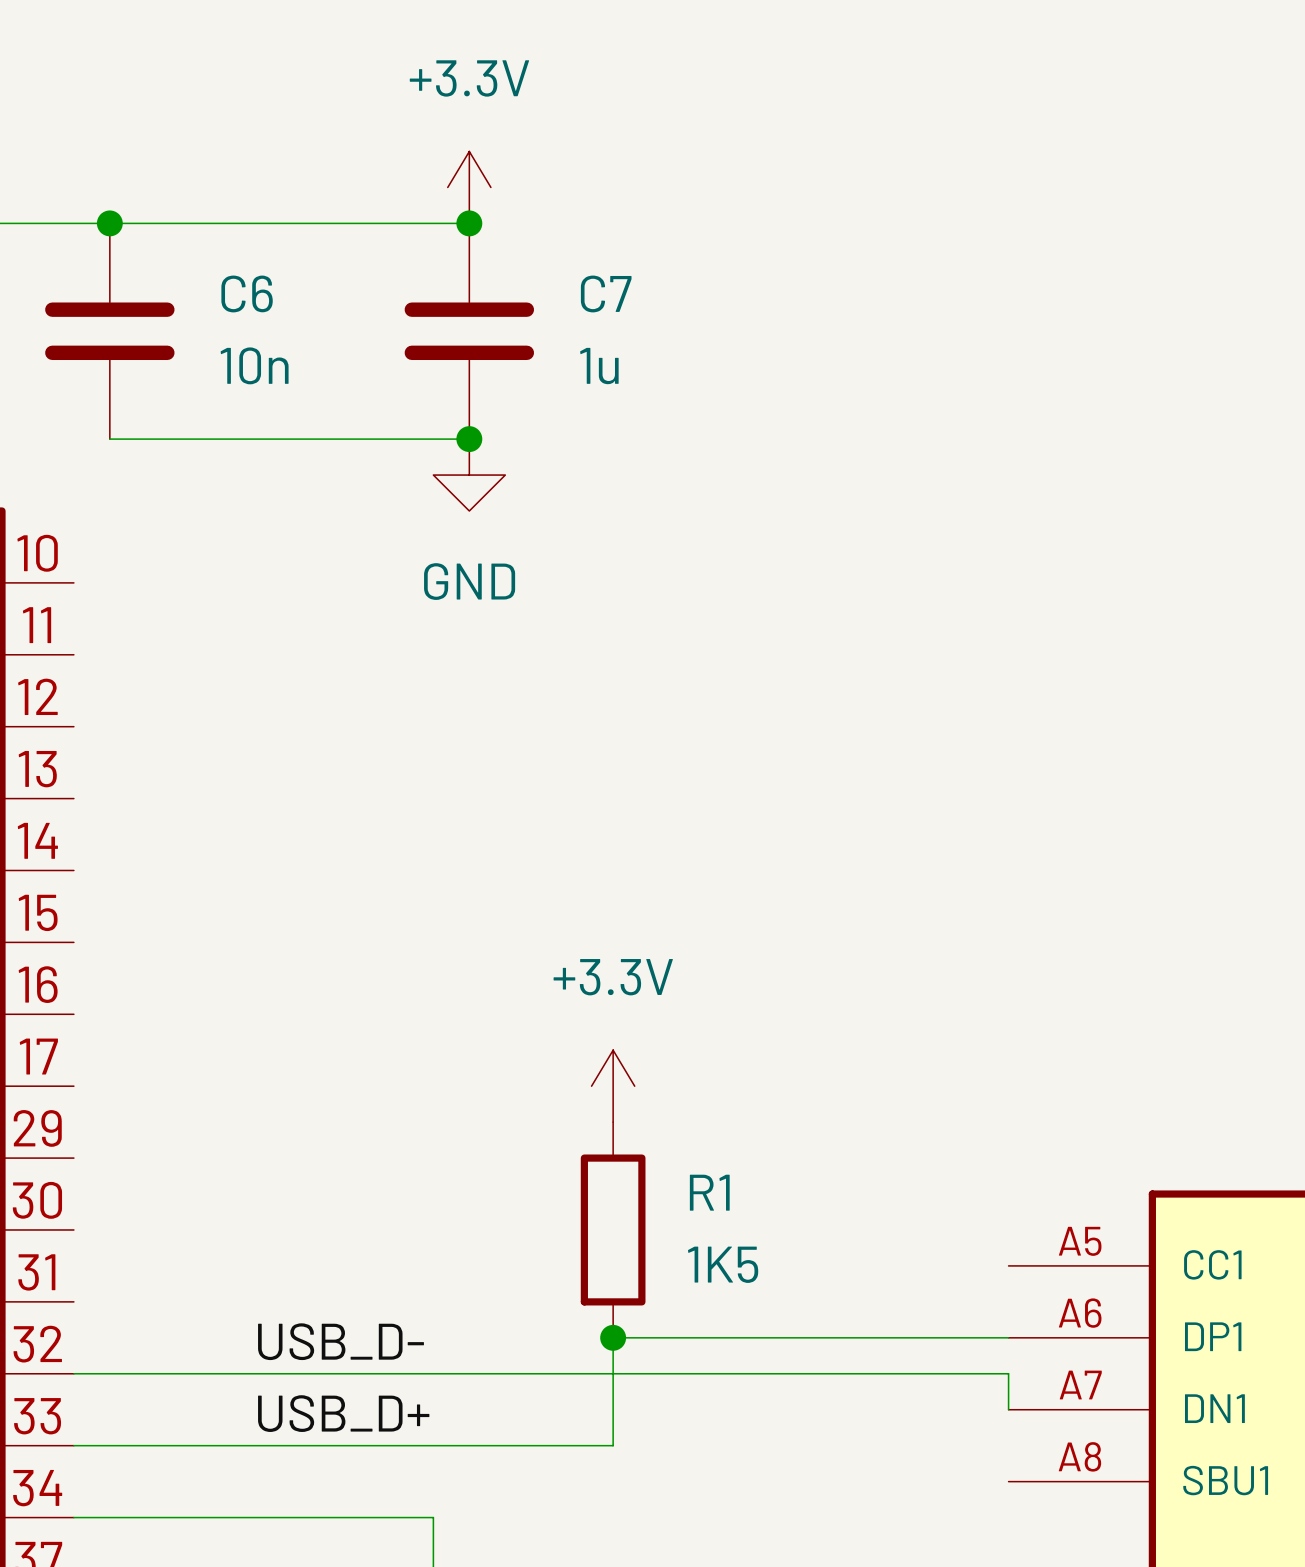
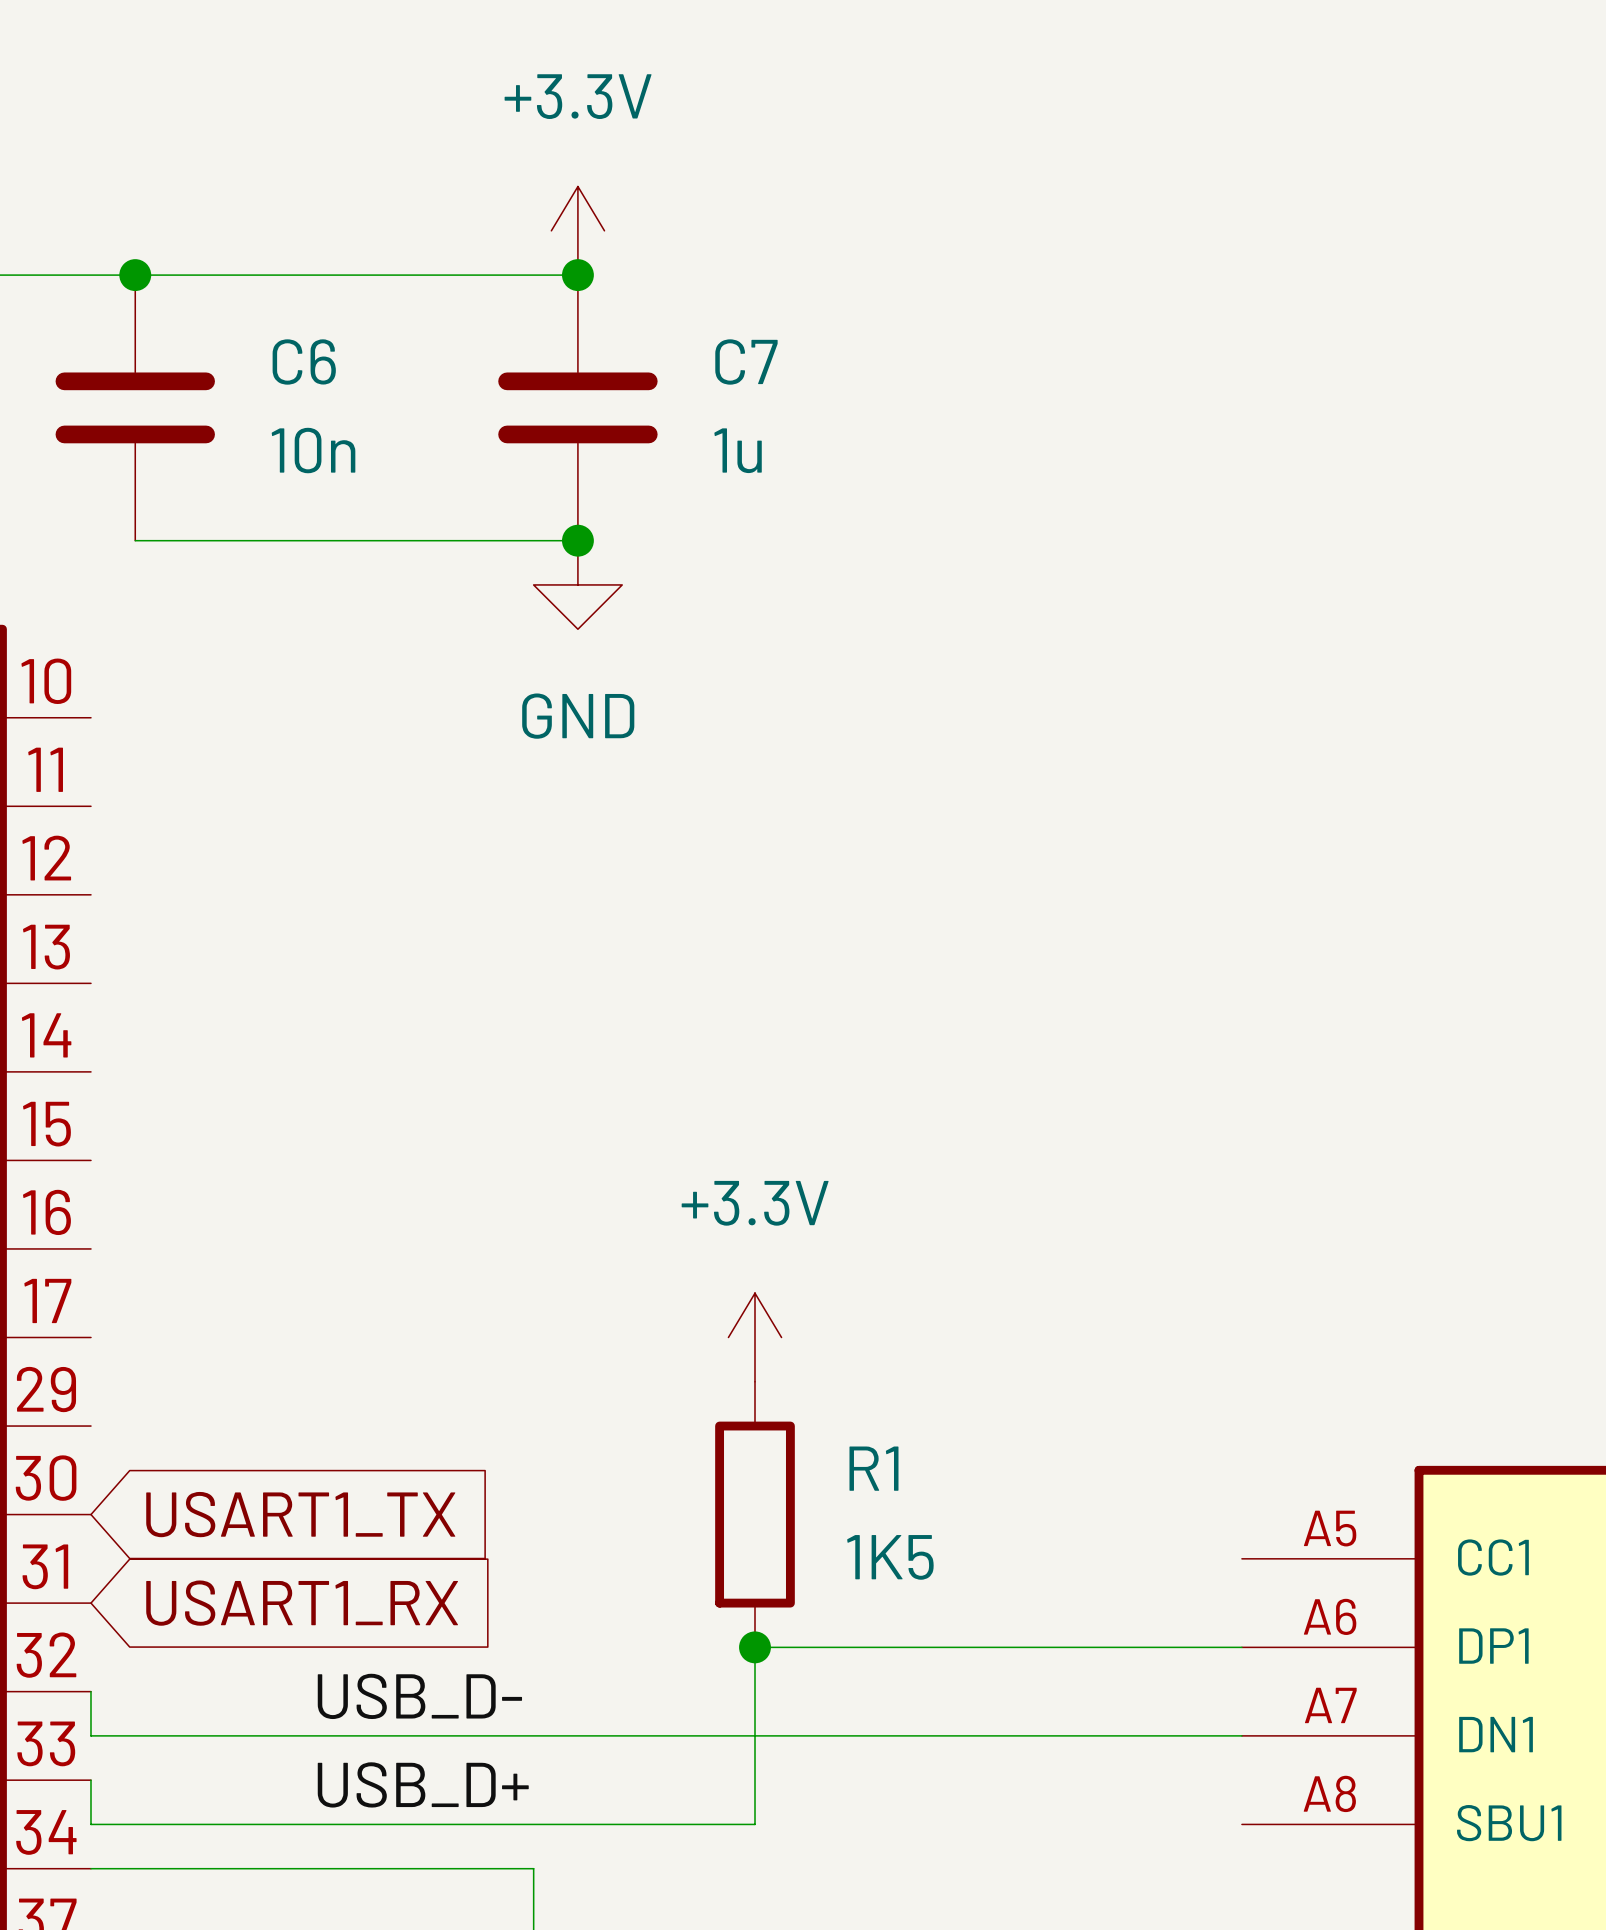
global label: none -> USART1_TX (300, 1514)
global label: none -> USART1_RX (302, 1603)
label position: USB_D- (341, 1341) -> USB_D- (419, 1696)
wire: (73, 1373) (1008, 1373) (1008, 1409) -> (90, 1691) (90, 1735) (1241, 1735)
label position: USB_D+ (343, 1413) -> USB_D+ (423, 1784)
wire: (73, 1445) (613, 1445) -> (90, 1780) (90, 1824) (755, 1824) (755, 1780)

